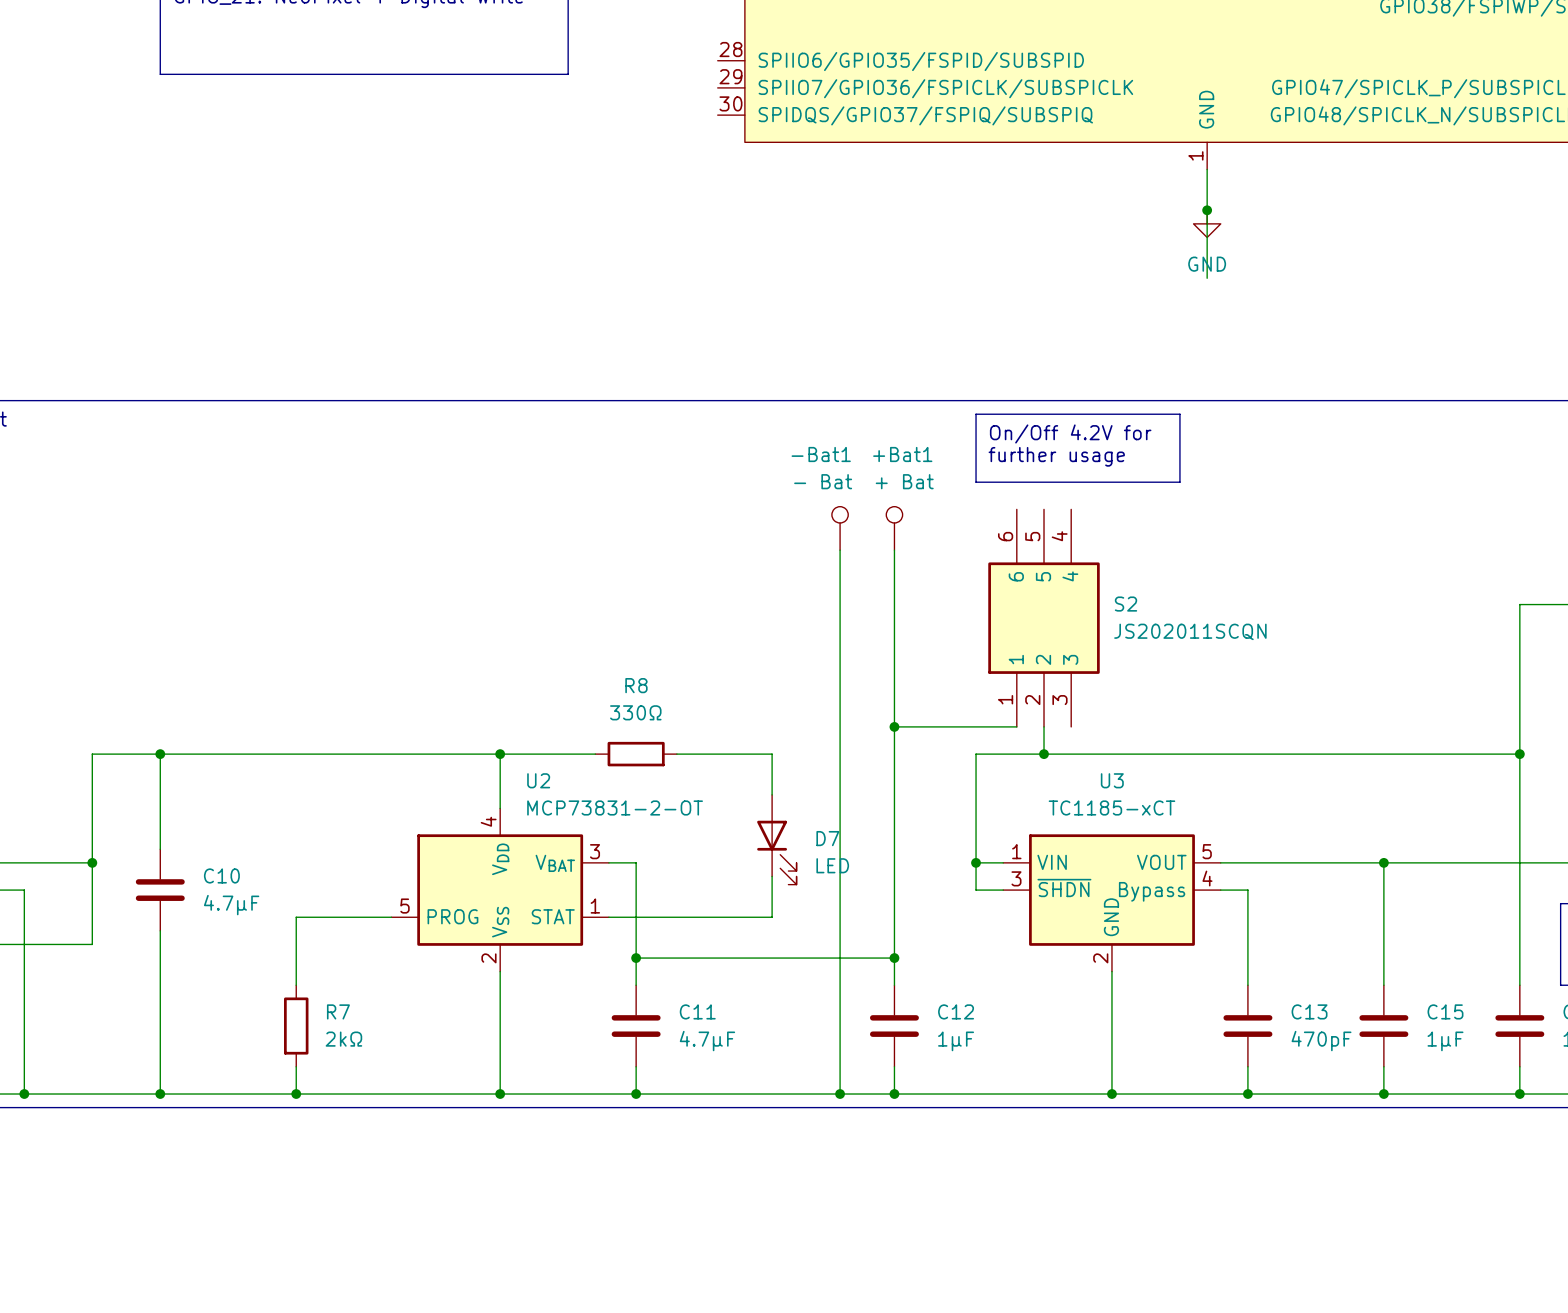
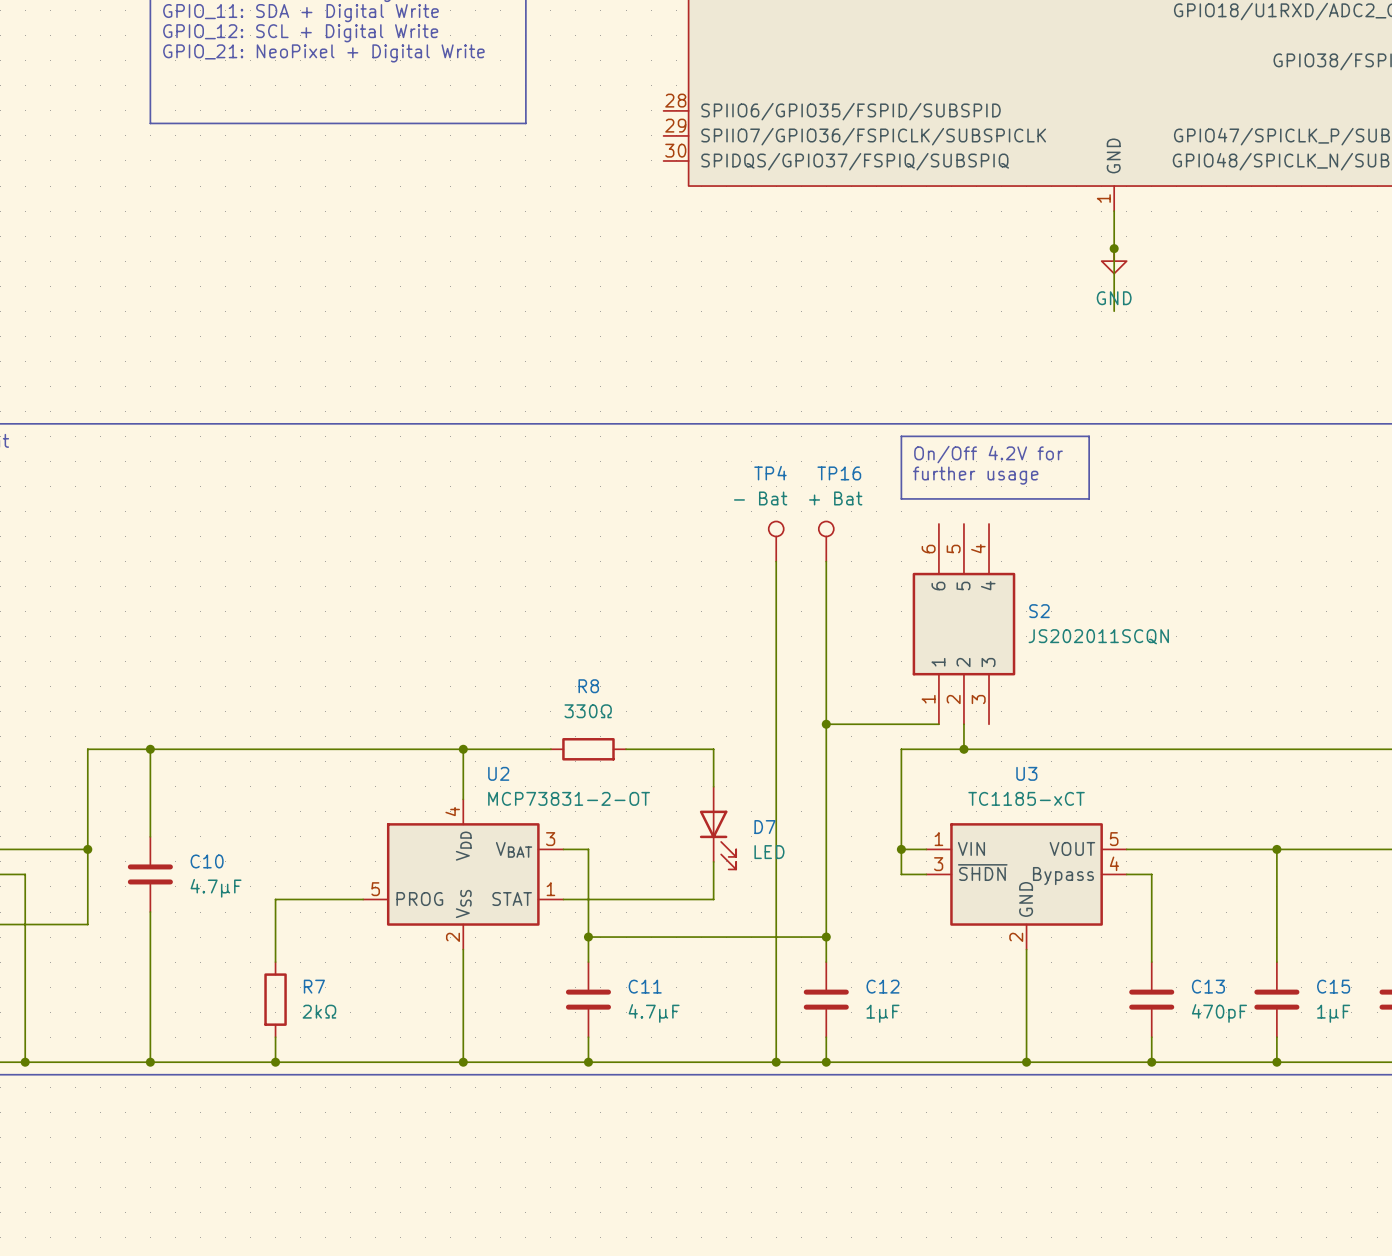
-Bat1 name: -Bat1 (821, 454) -> TP4 (770, 473)
+Bat1 name: +Bat1 (902, 454) -> TP16 (839, 473)

